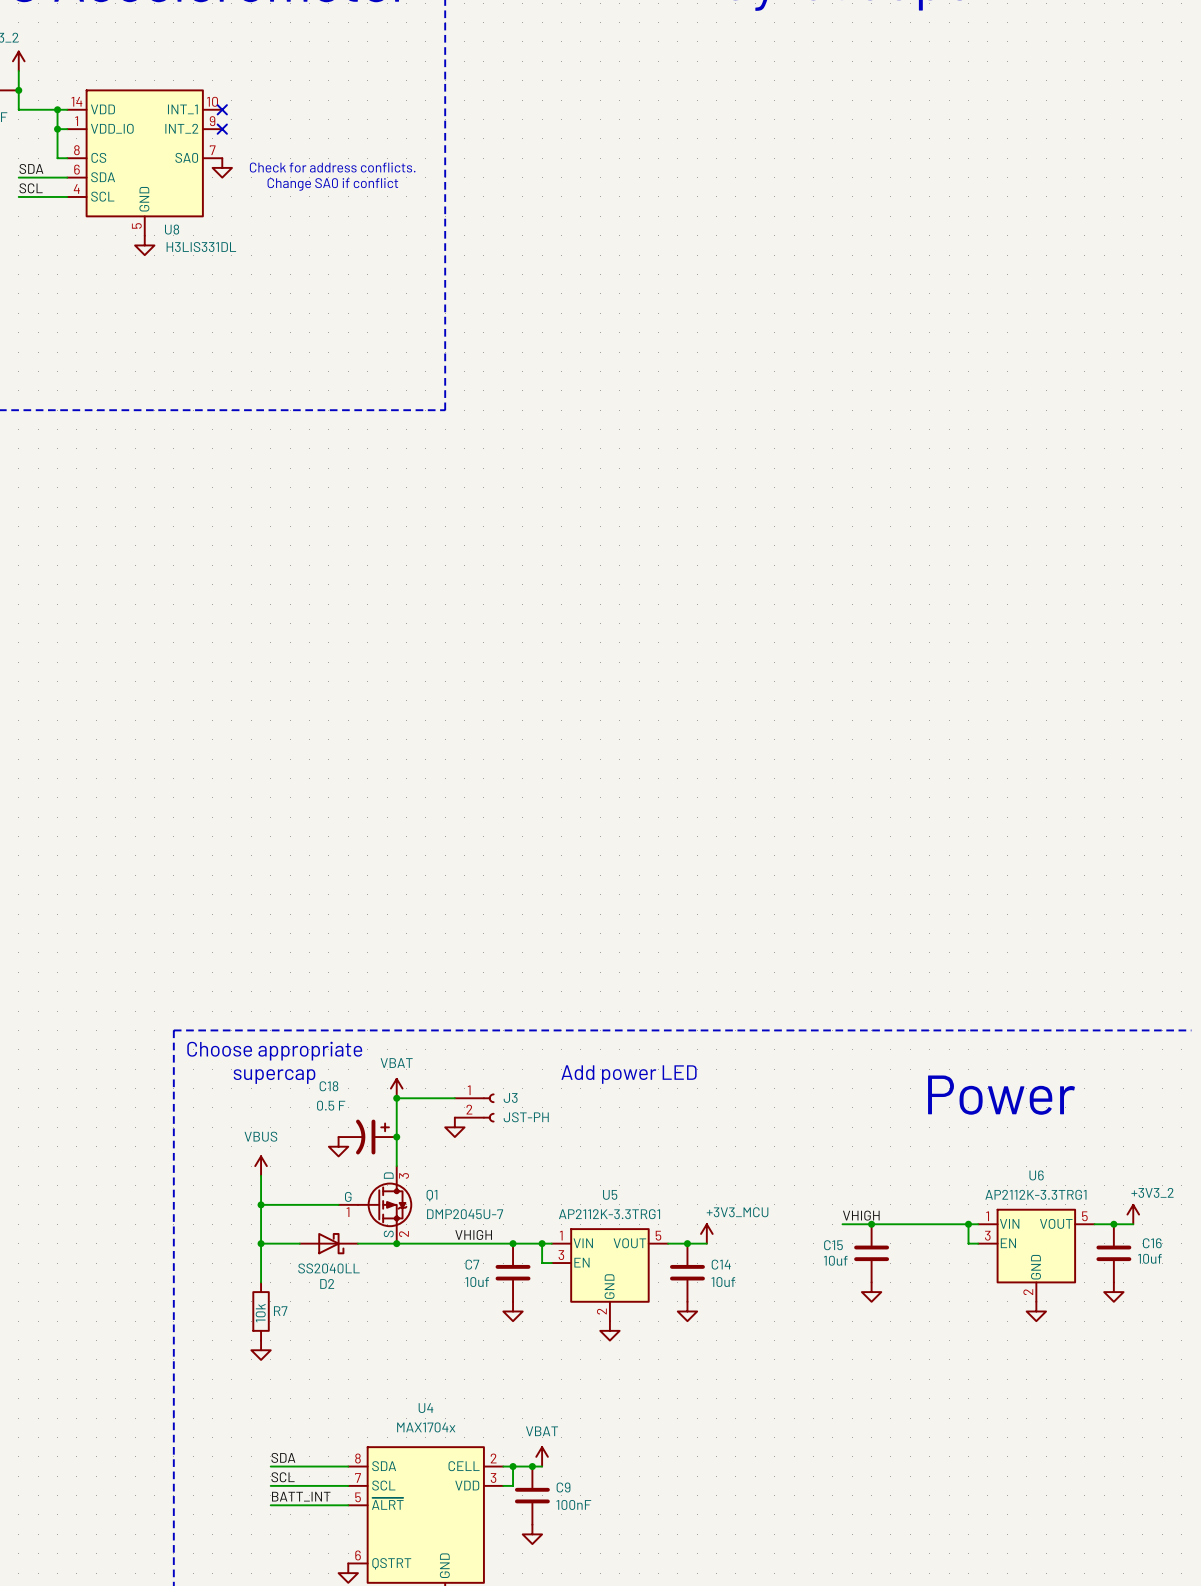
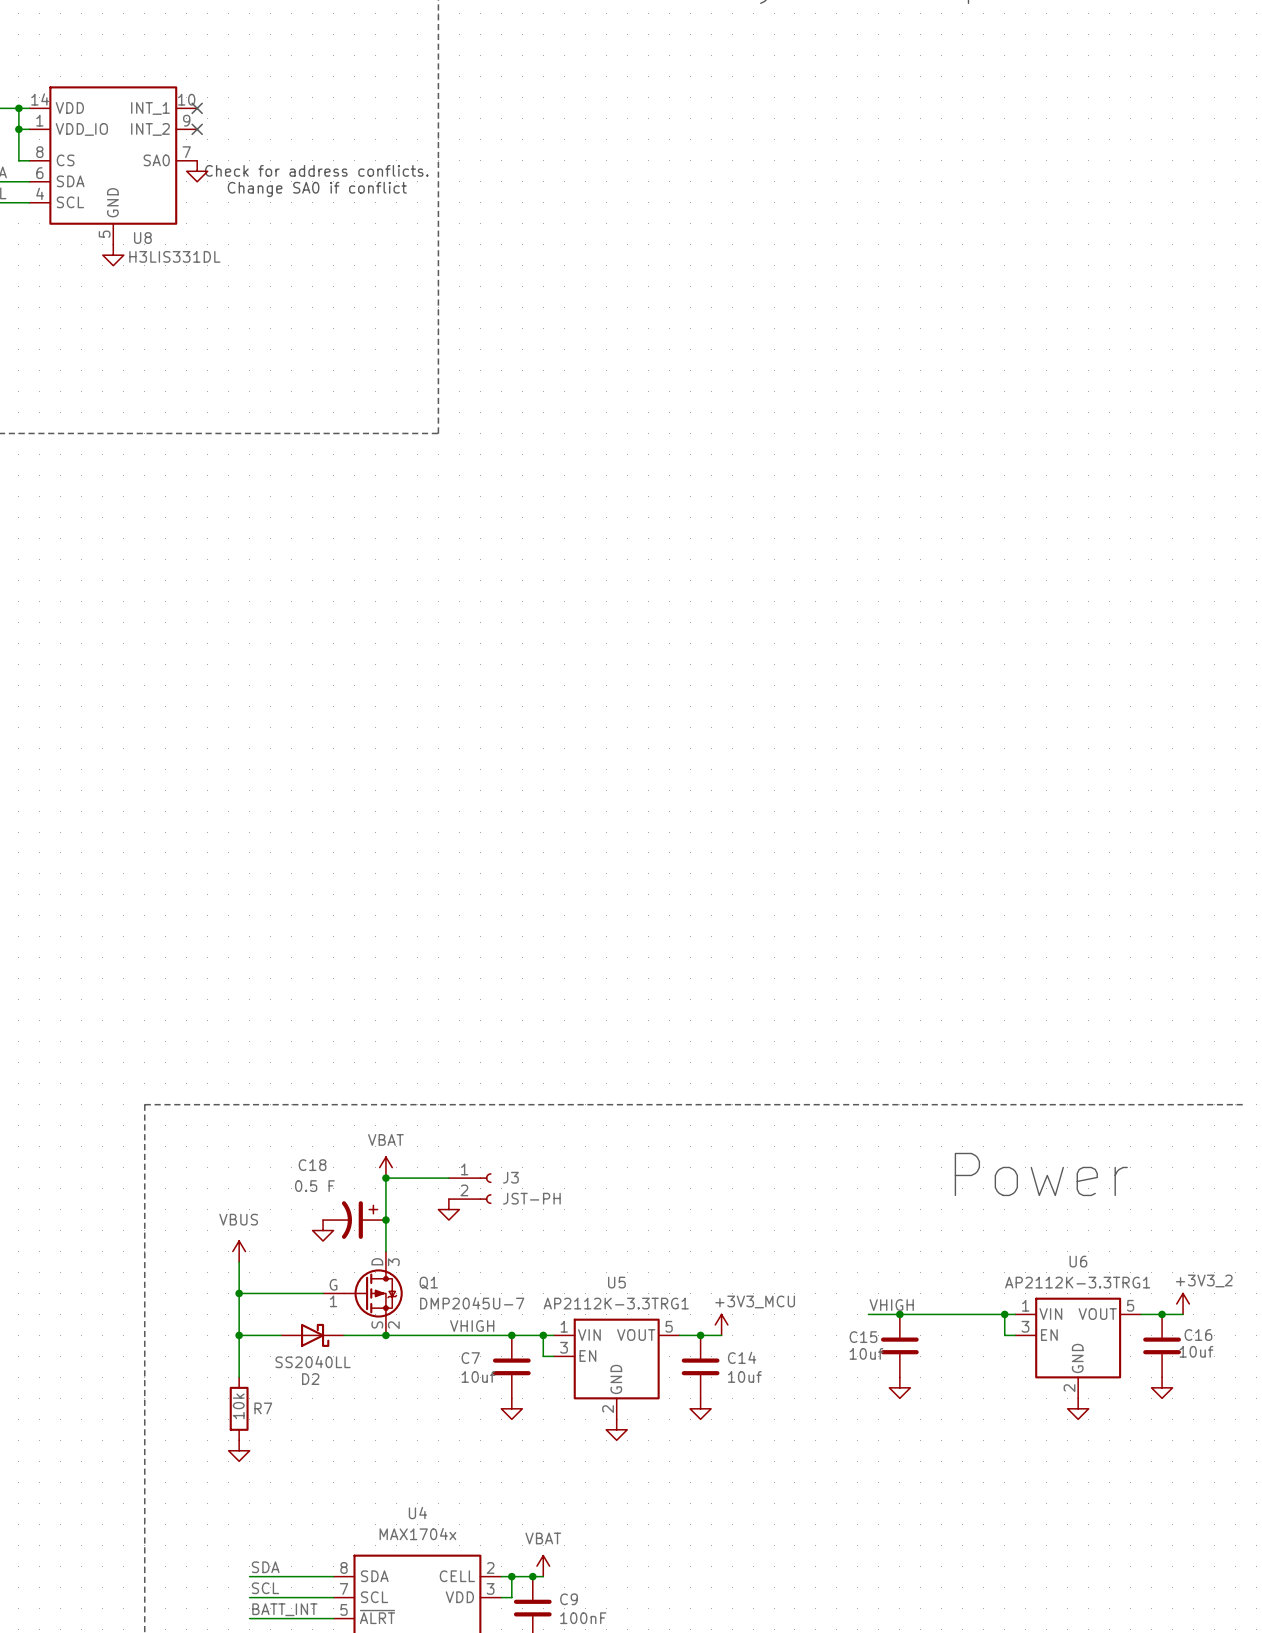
text: Choose appropriate (274, 1051) -> none
text: Add power LED (629, 1074) -> none
text: supercap (274, 1076) -> none

